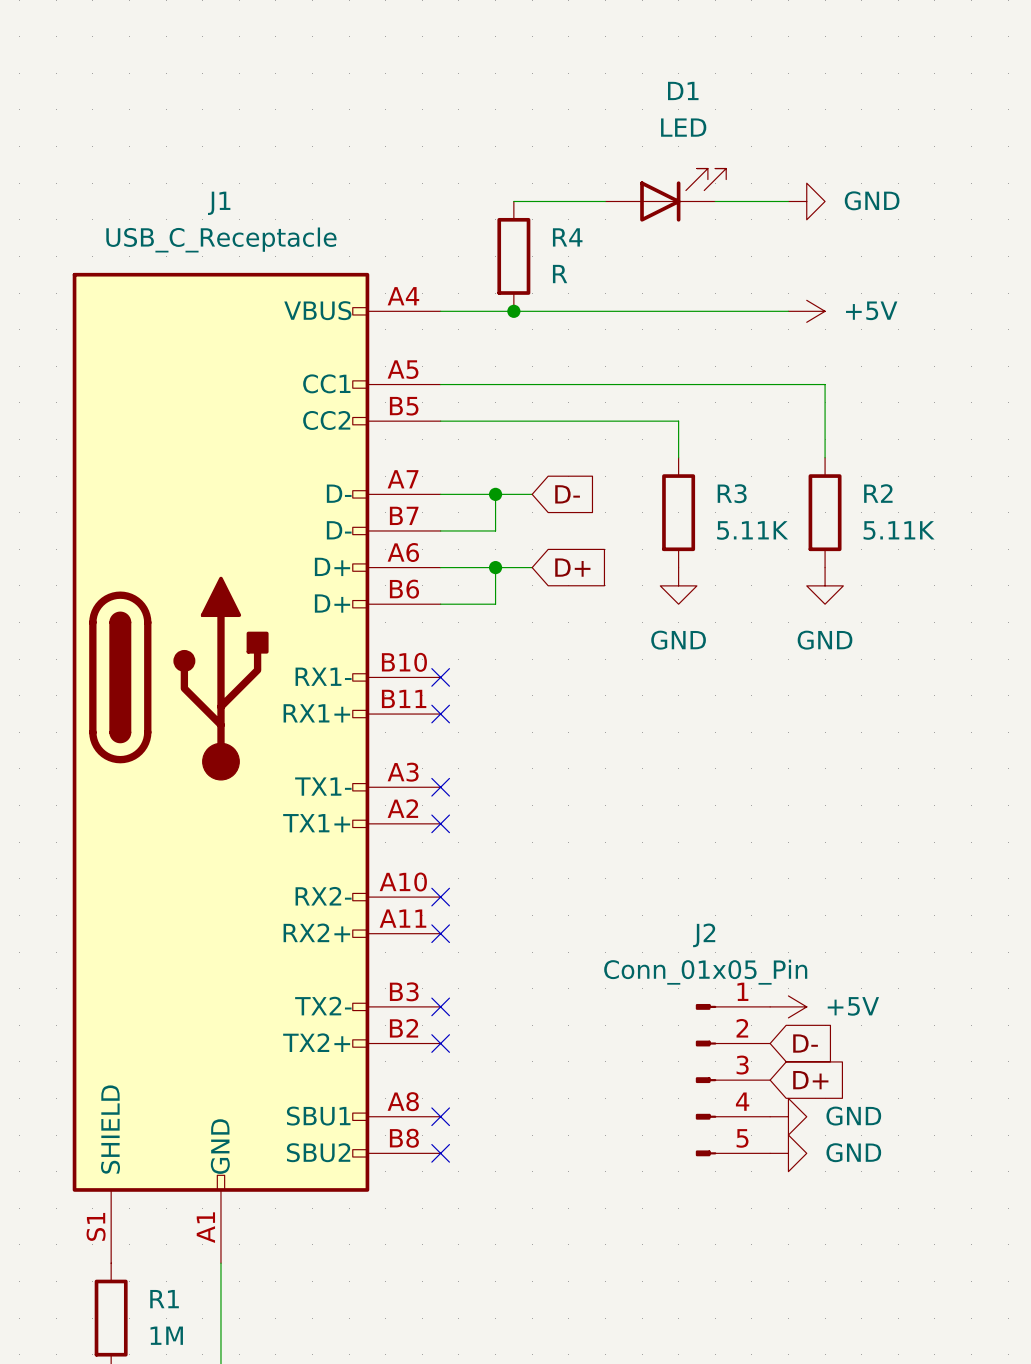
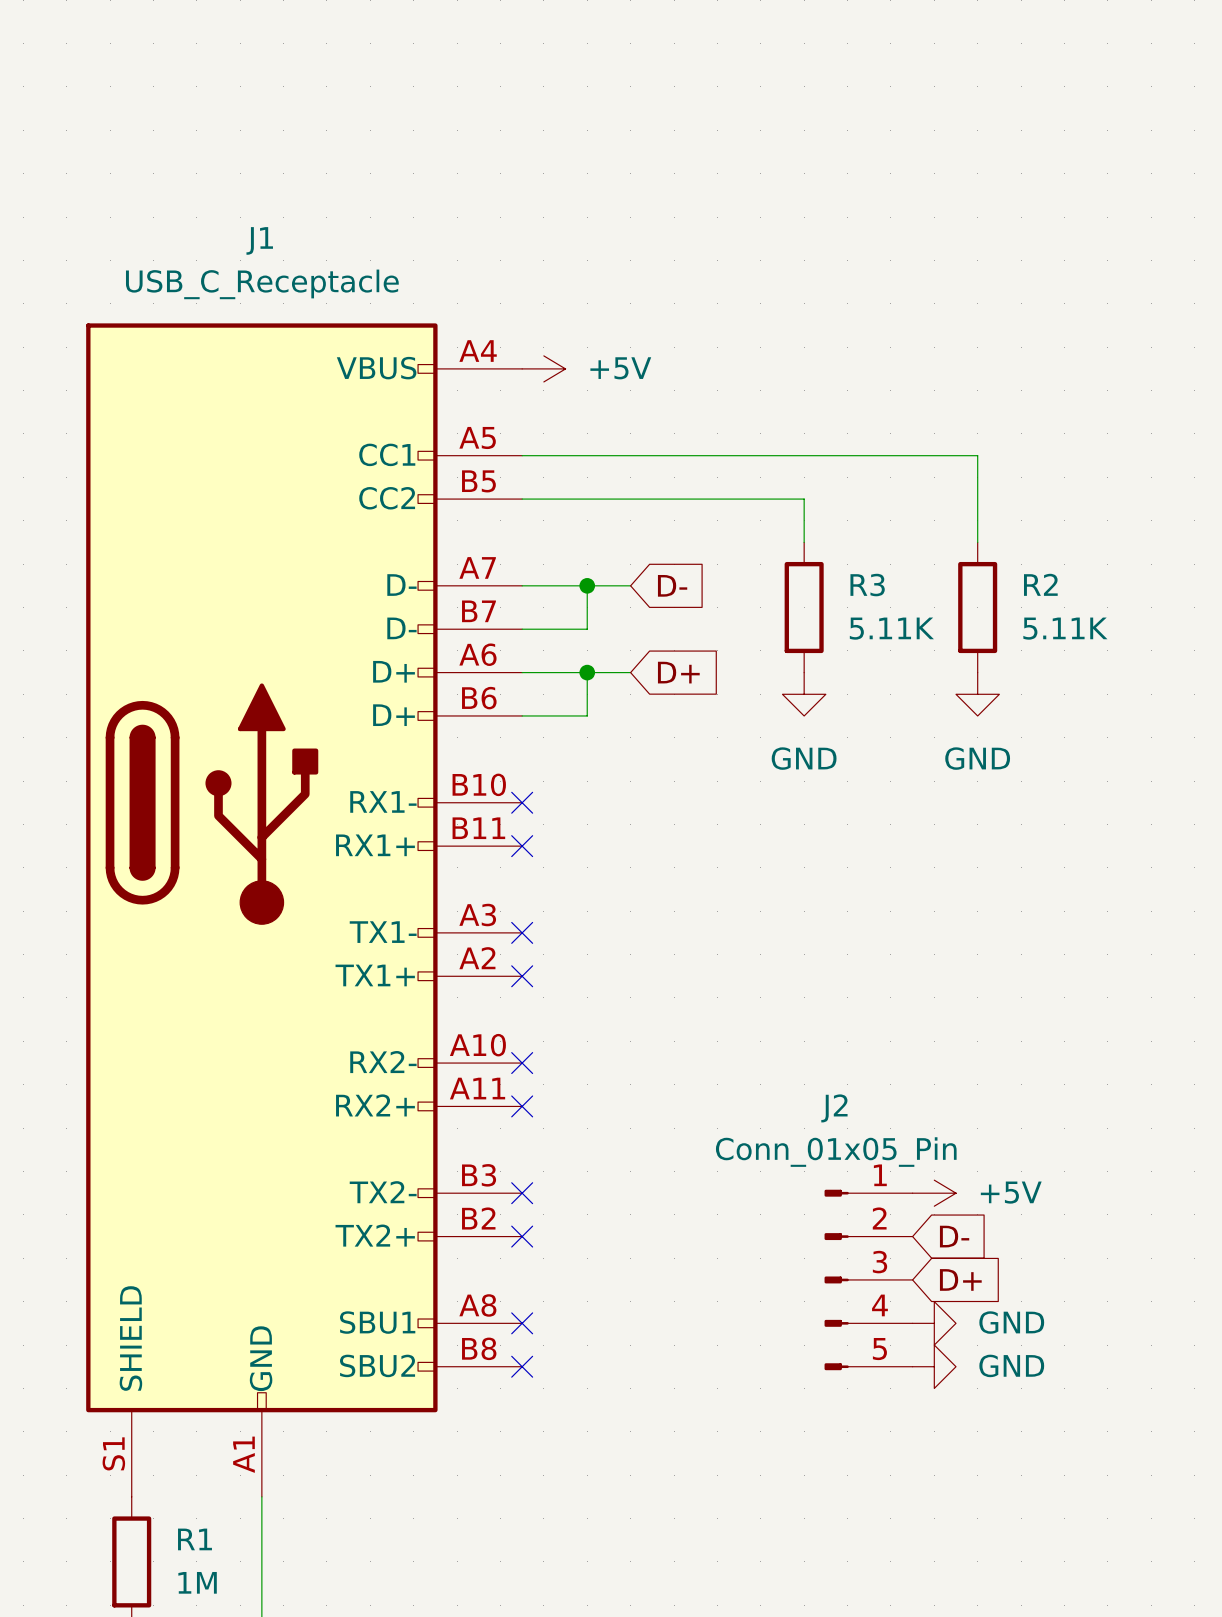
D1: LED (665, 195) -> none
wire: (513, 201) (605, 201) -> none
wire: (715, 201) (788, 201) -> none
power symbol: GND (806, 201) -> none
R4: R (513, 256) -> none
wire: (440, 311) (788, 311) -> none
junction: (513, 311) -> none
power symbol position: +5V (806, 311) -> +5V (543, 368)

